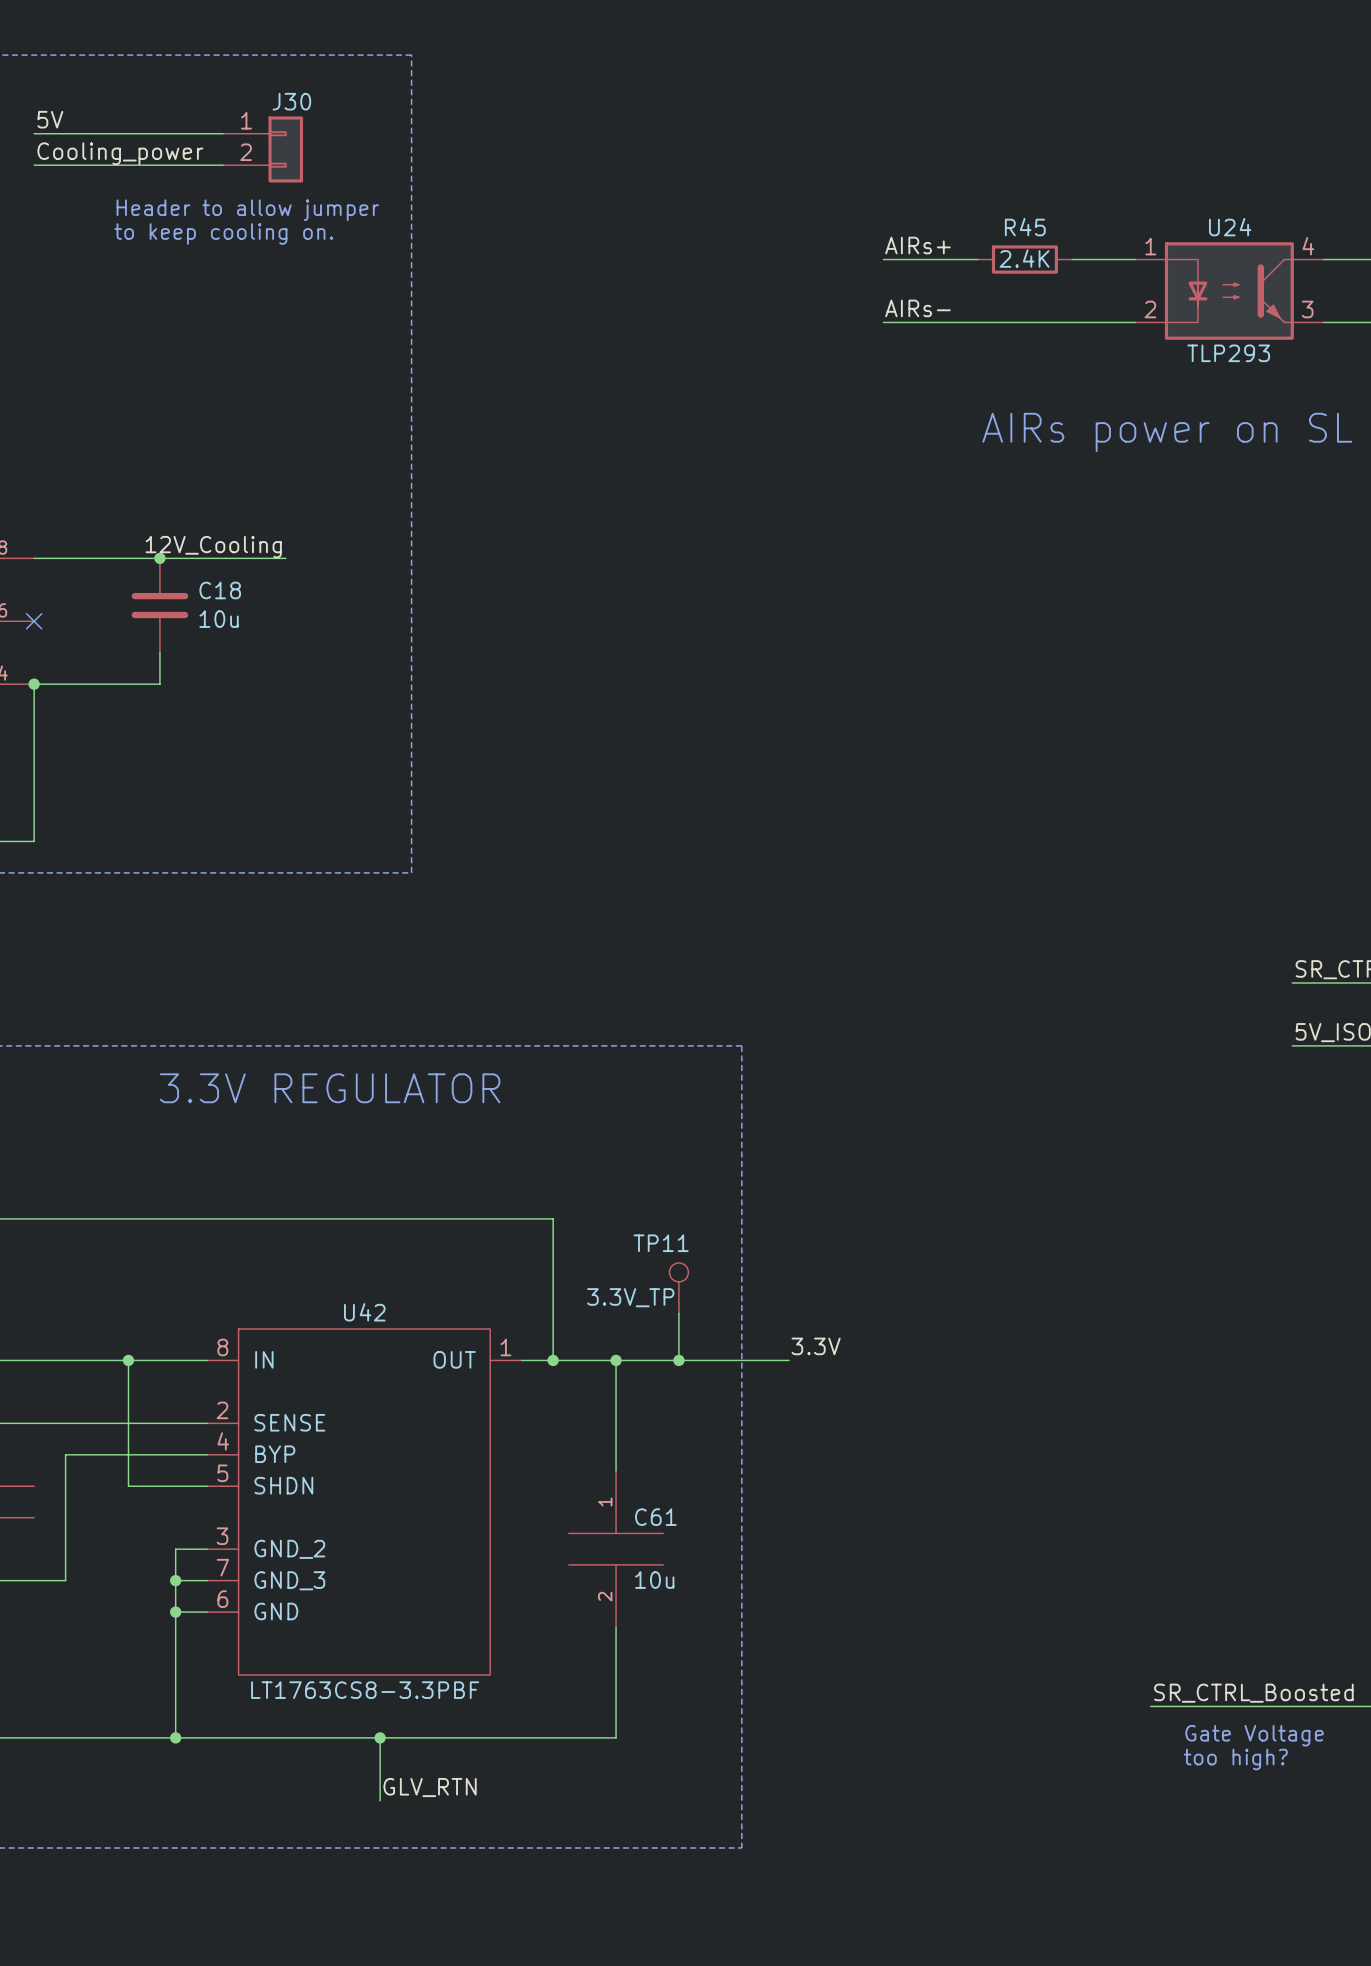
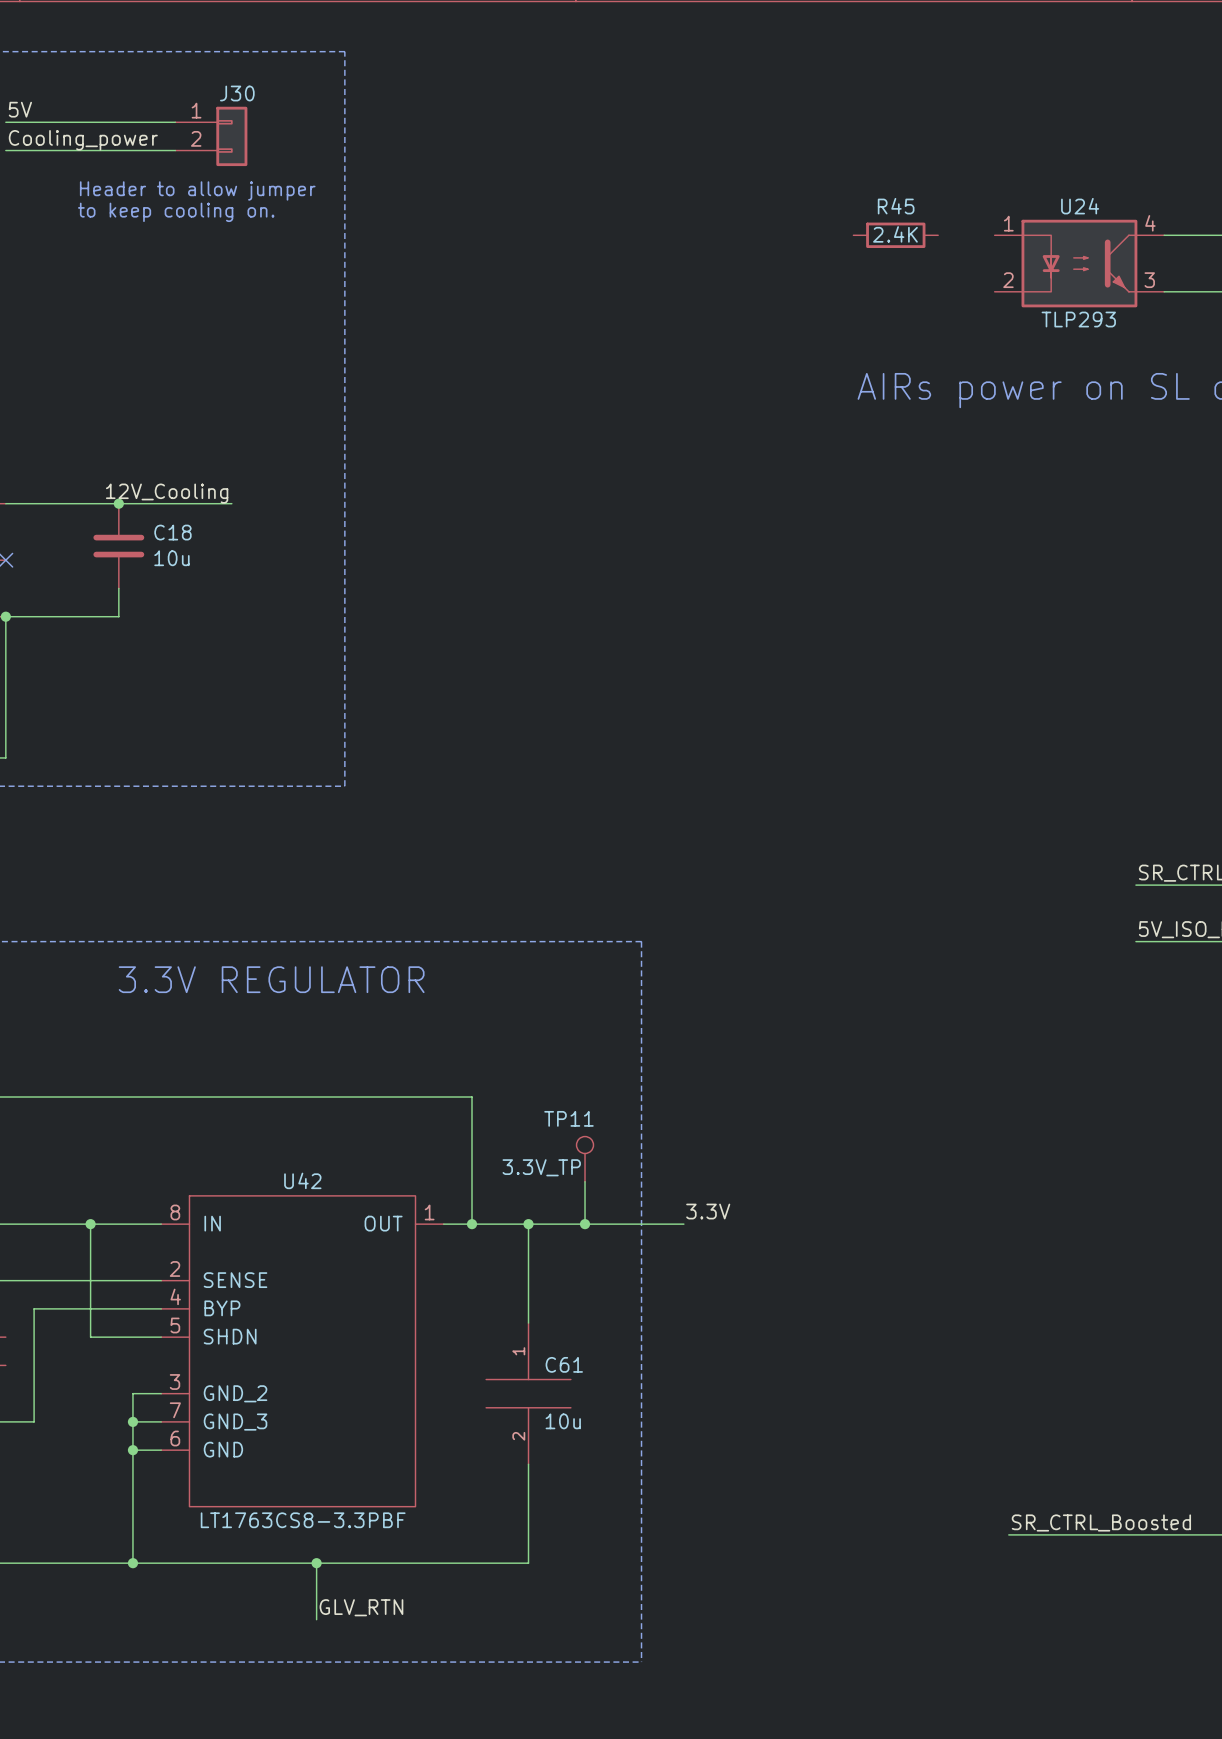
label: AIRs+ (917, 245) -> none
wire: (883, 259) (977, 259) -> none
wire: (1072, 259) (1135, 259) -> none
label: AIRs- (917, 308) -> none
wire: (883, 322) (1135, 322) -> none
text: Gate Voltage (1254, 1735) -> none
text: too high? (1235, 1759) -> none

